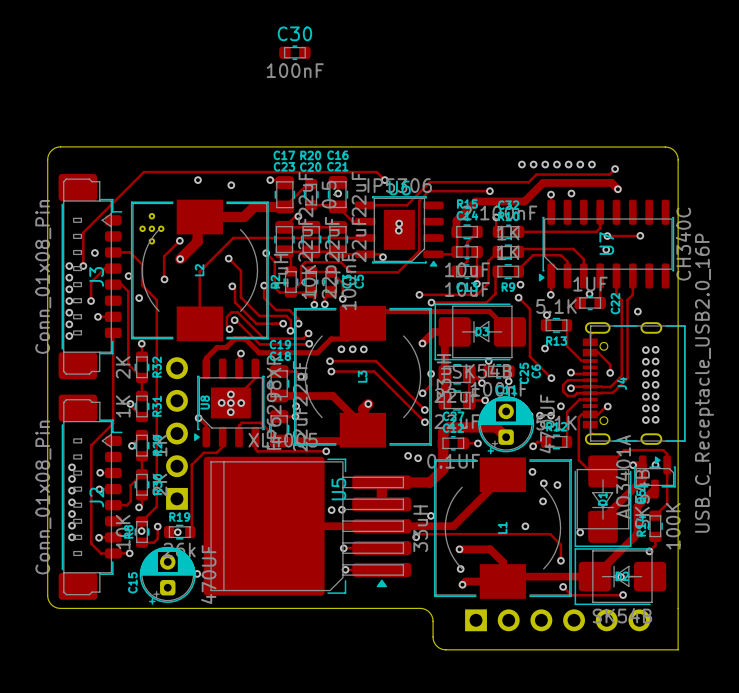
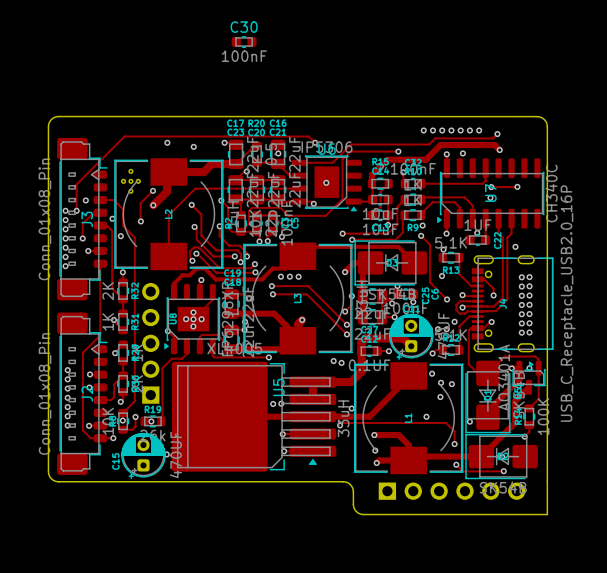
via: (399, 223) -> none

